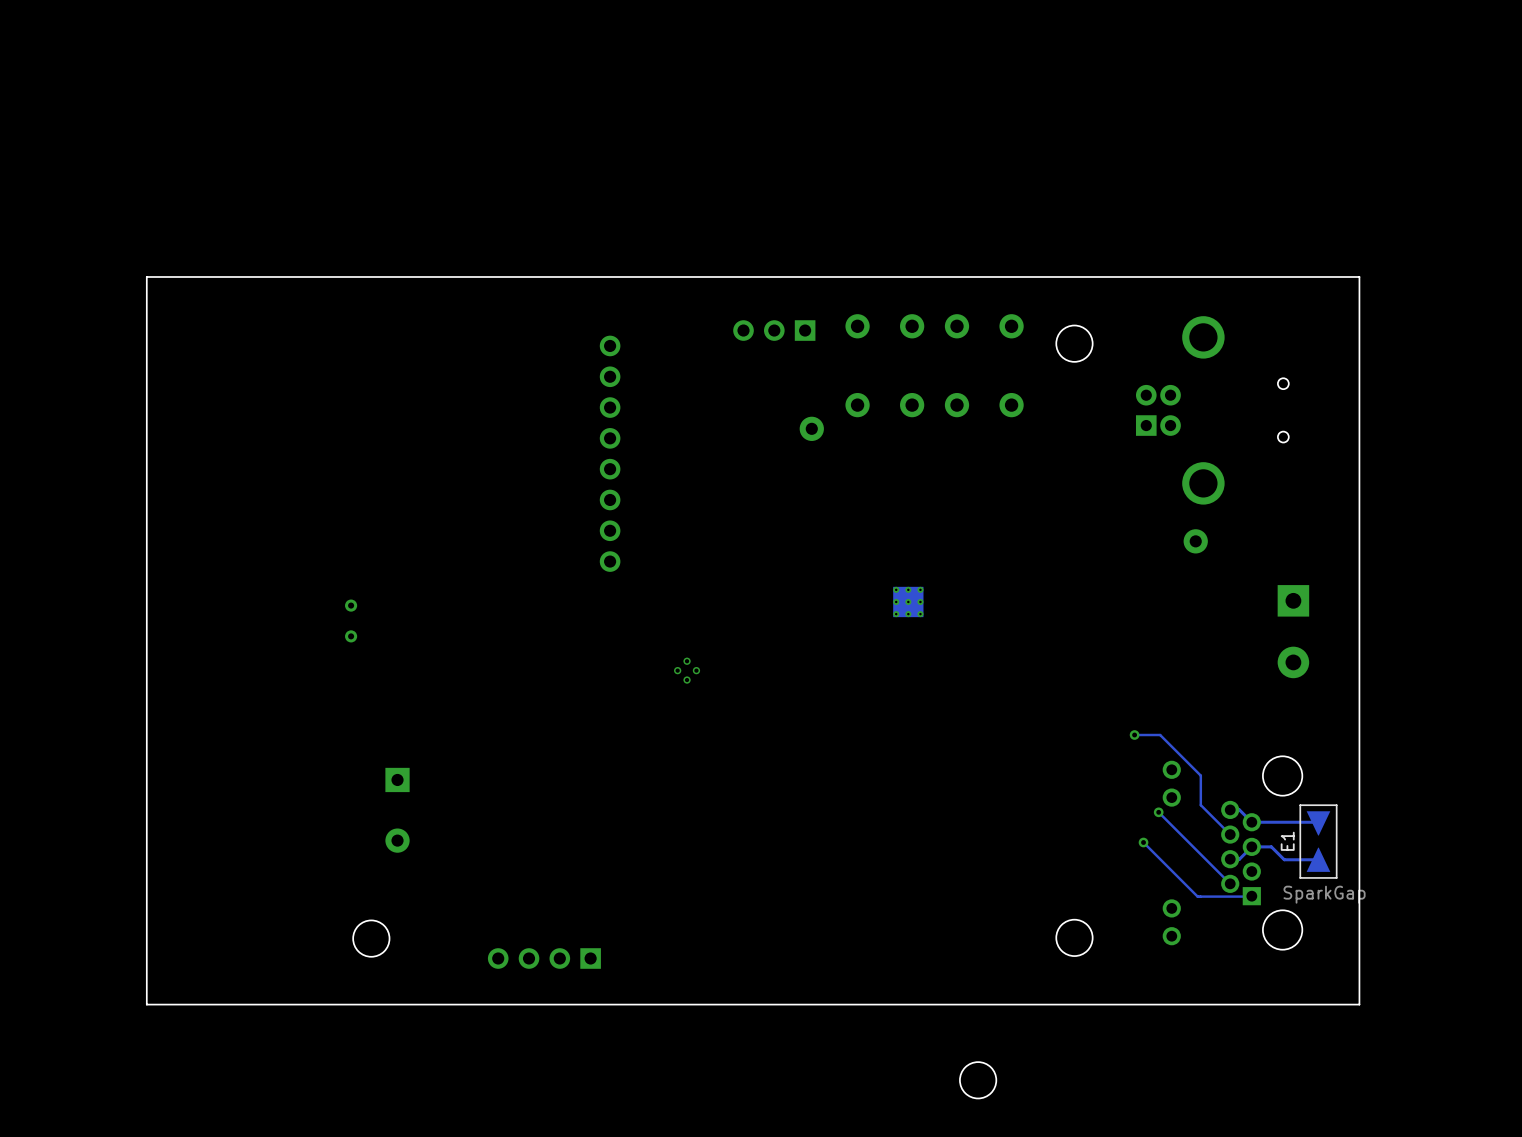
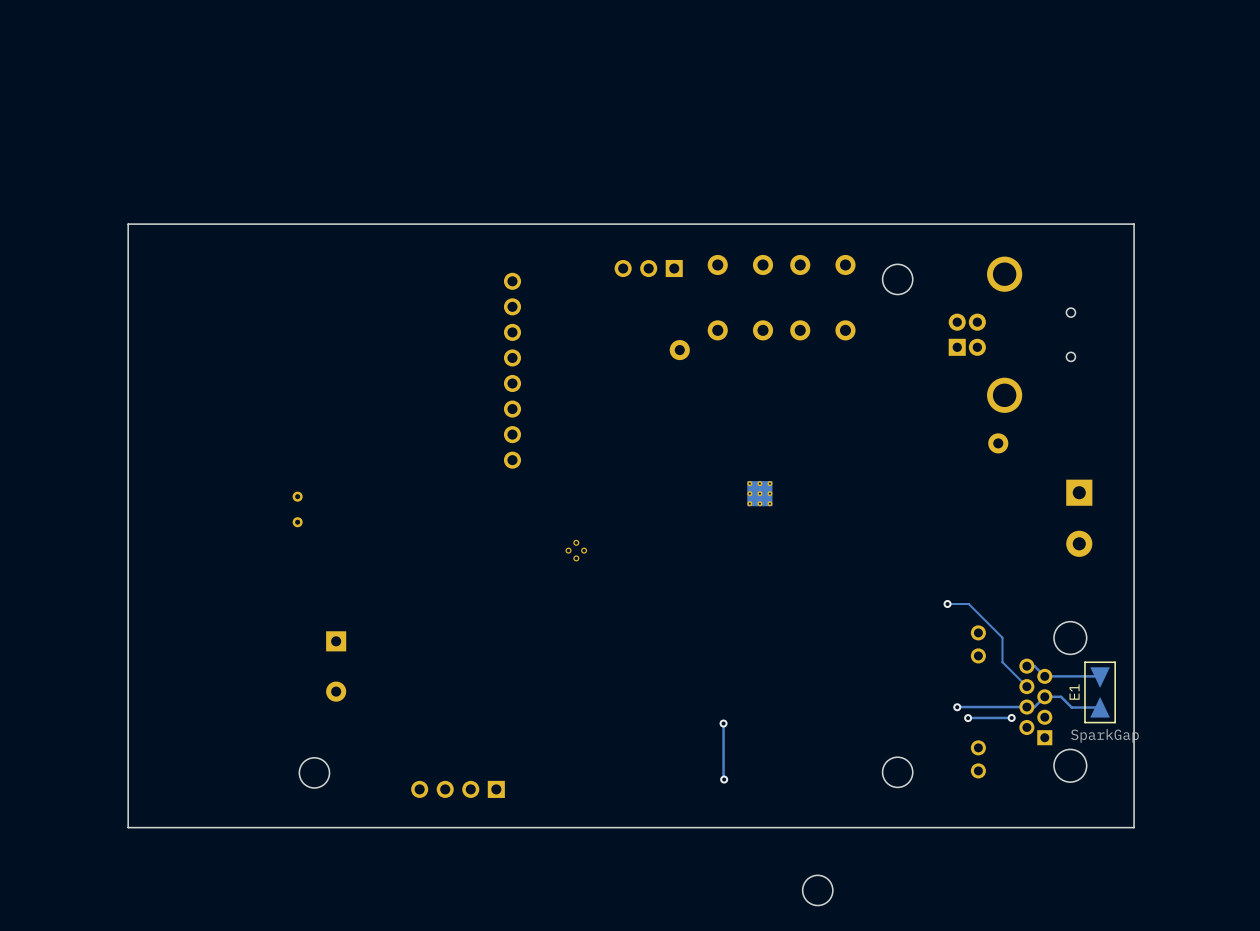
track: (1158, 812) (1230, 883) -> none
via: (1158, 812) -> none
track: (1143, 842) (1197, 896) (1251, 896) -> none
via: (1143, 842) -> none
via: none -> (957, 707)
track: none -> (1026, 707) (957, 707)
via: none -> (968, 718)
track: none -> (1011, 717) (968, 717)
via: none -> (1011, 717)
track: none -> (723, 723) (724, 779)
via: none -> (723, 723)
via: none -> (724, 779)

